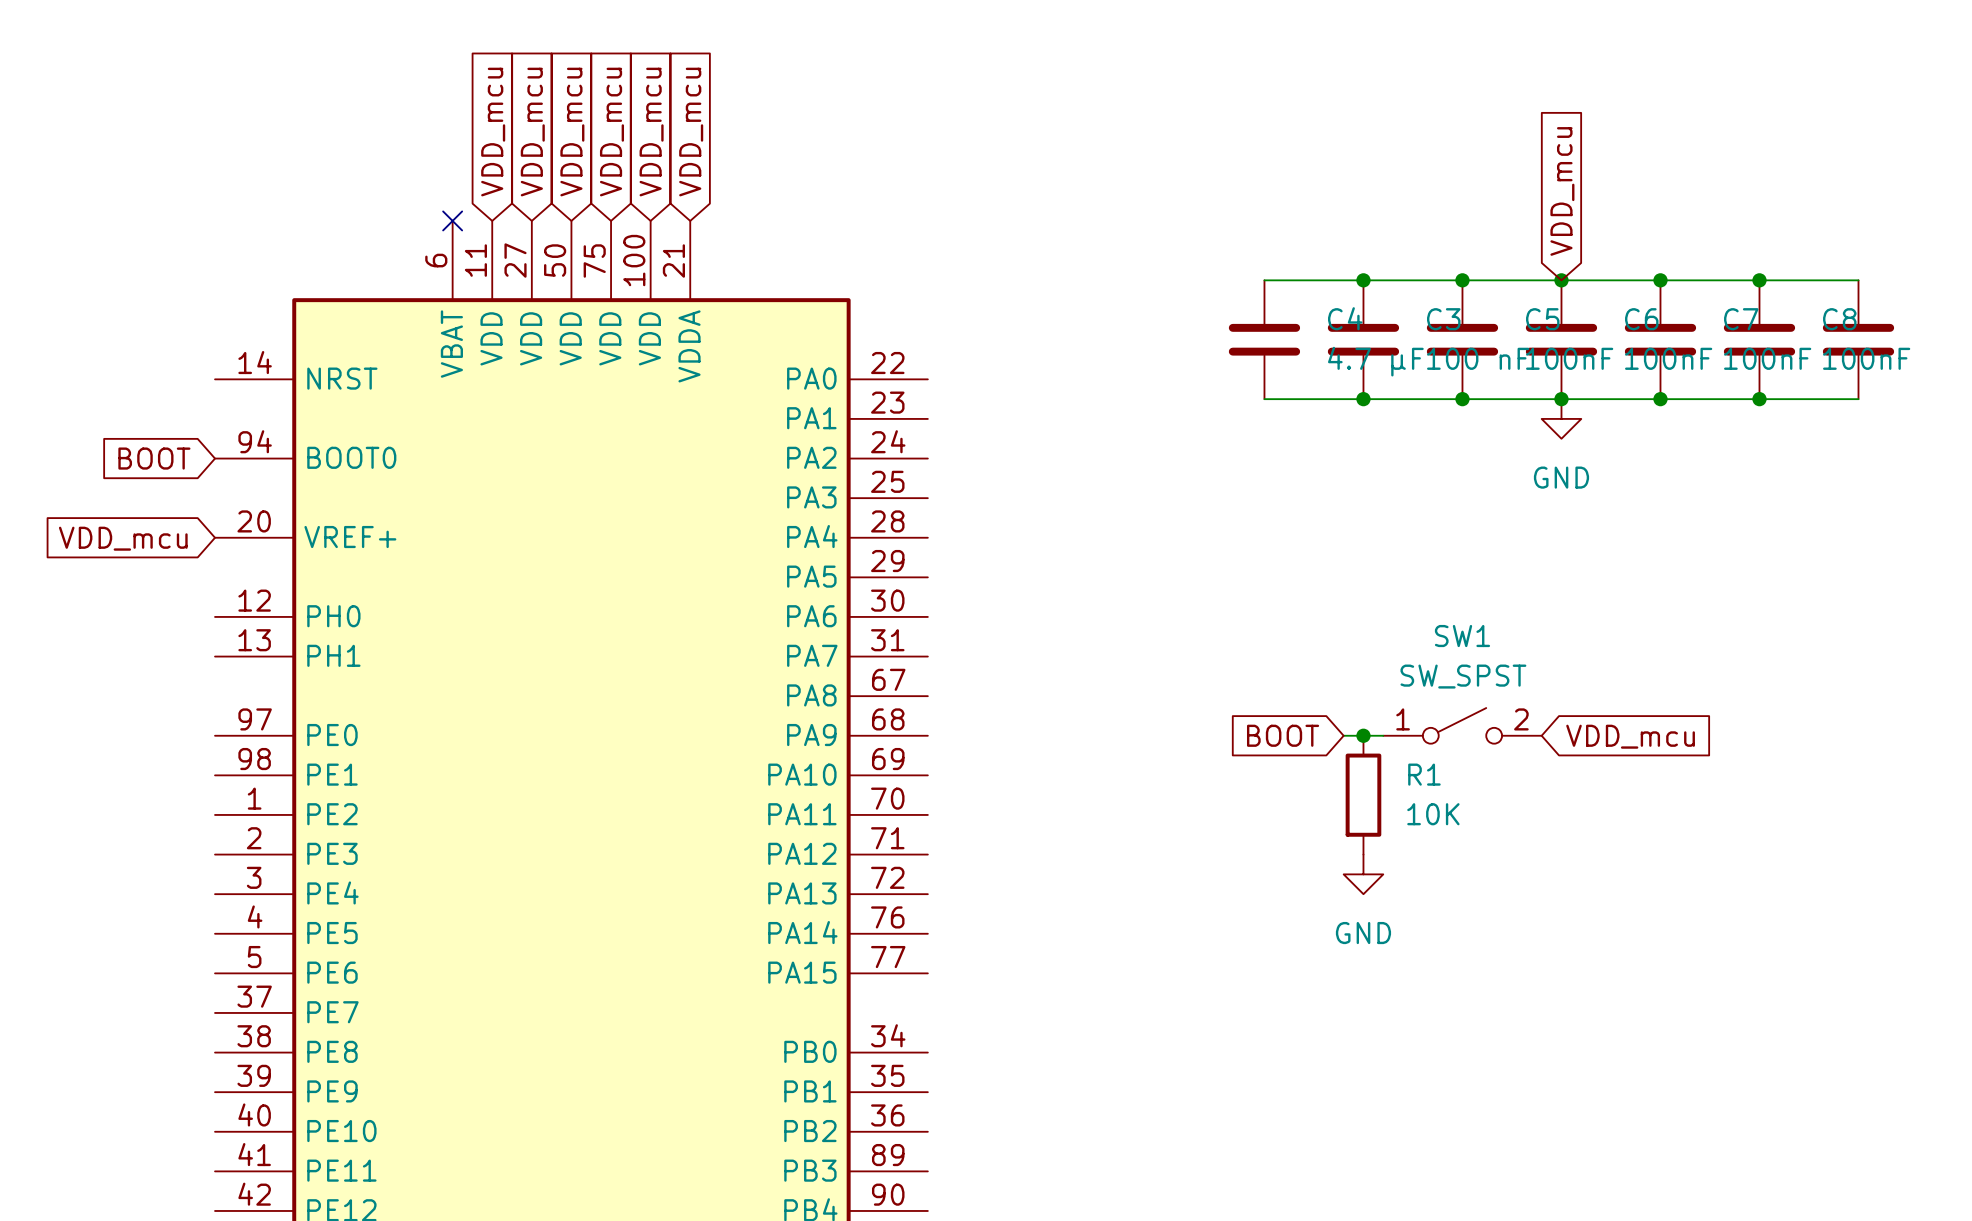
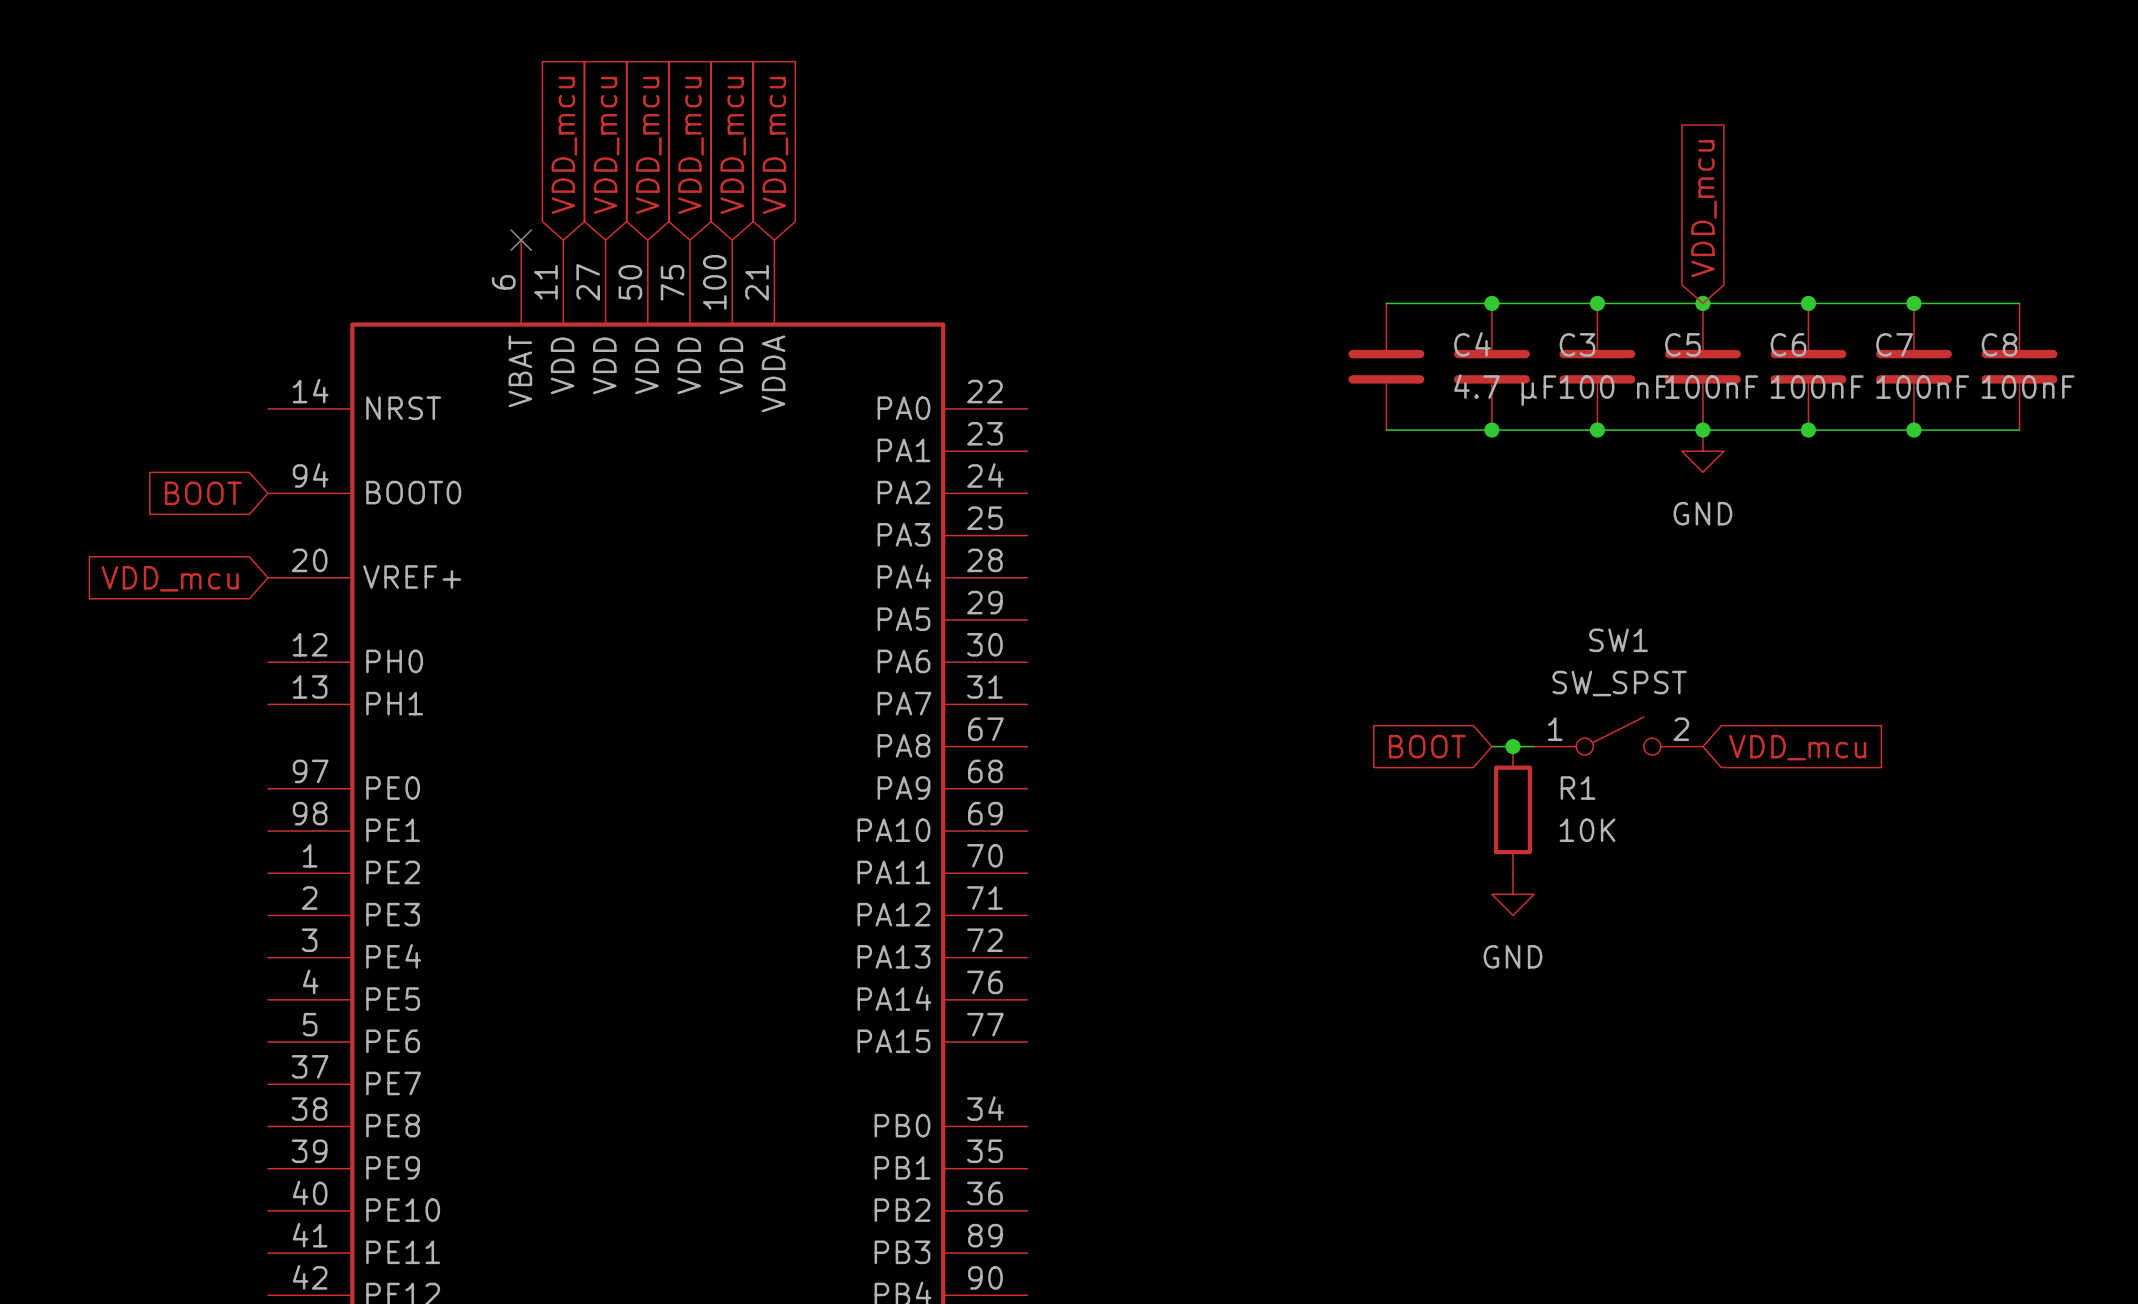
SW1 position: (1462, 725) -> (1618, 736)
global label position: BOOT (1283, 735) -> BOOT (1427, 746)
wire: (1343, 735) (1383, 735) -> (1491, 746) (1534, 746)
junction position: (1363, 735) -> (1513, 746)
global label position: VDD_mcu (1630, 736) -> VDD_mcu (1797, 747)
R1 position: (1363, 795) -> (1513, 809)
power symbol position: GND (1363, 874) -> GND (1513, 894)

